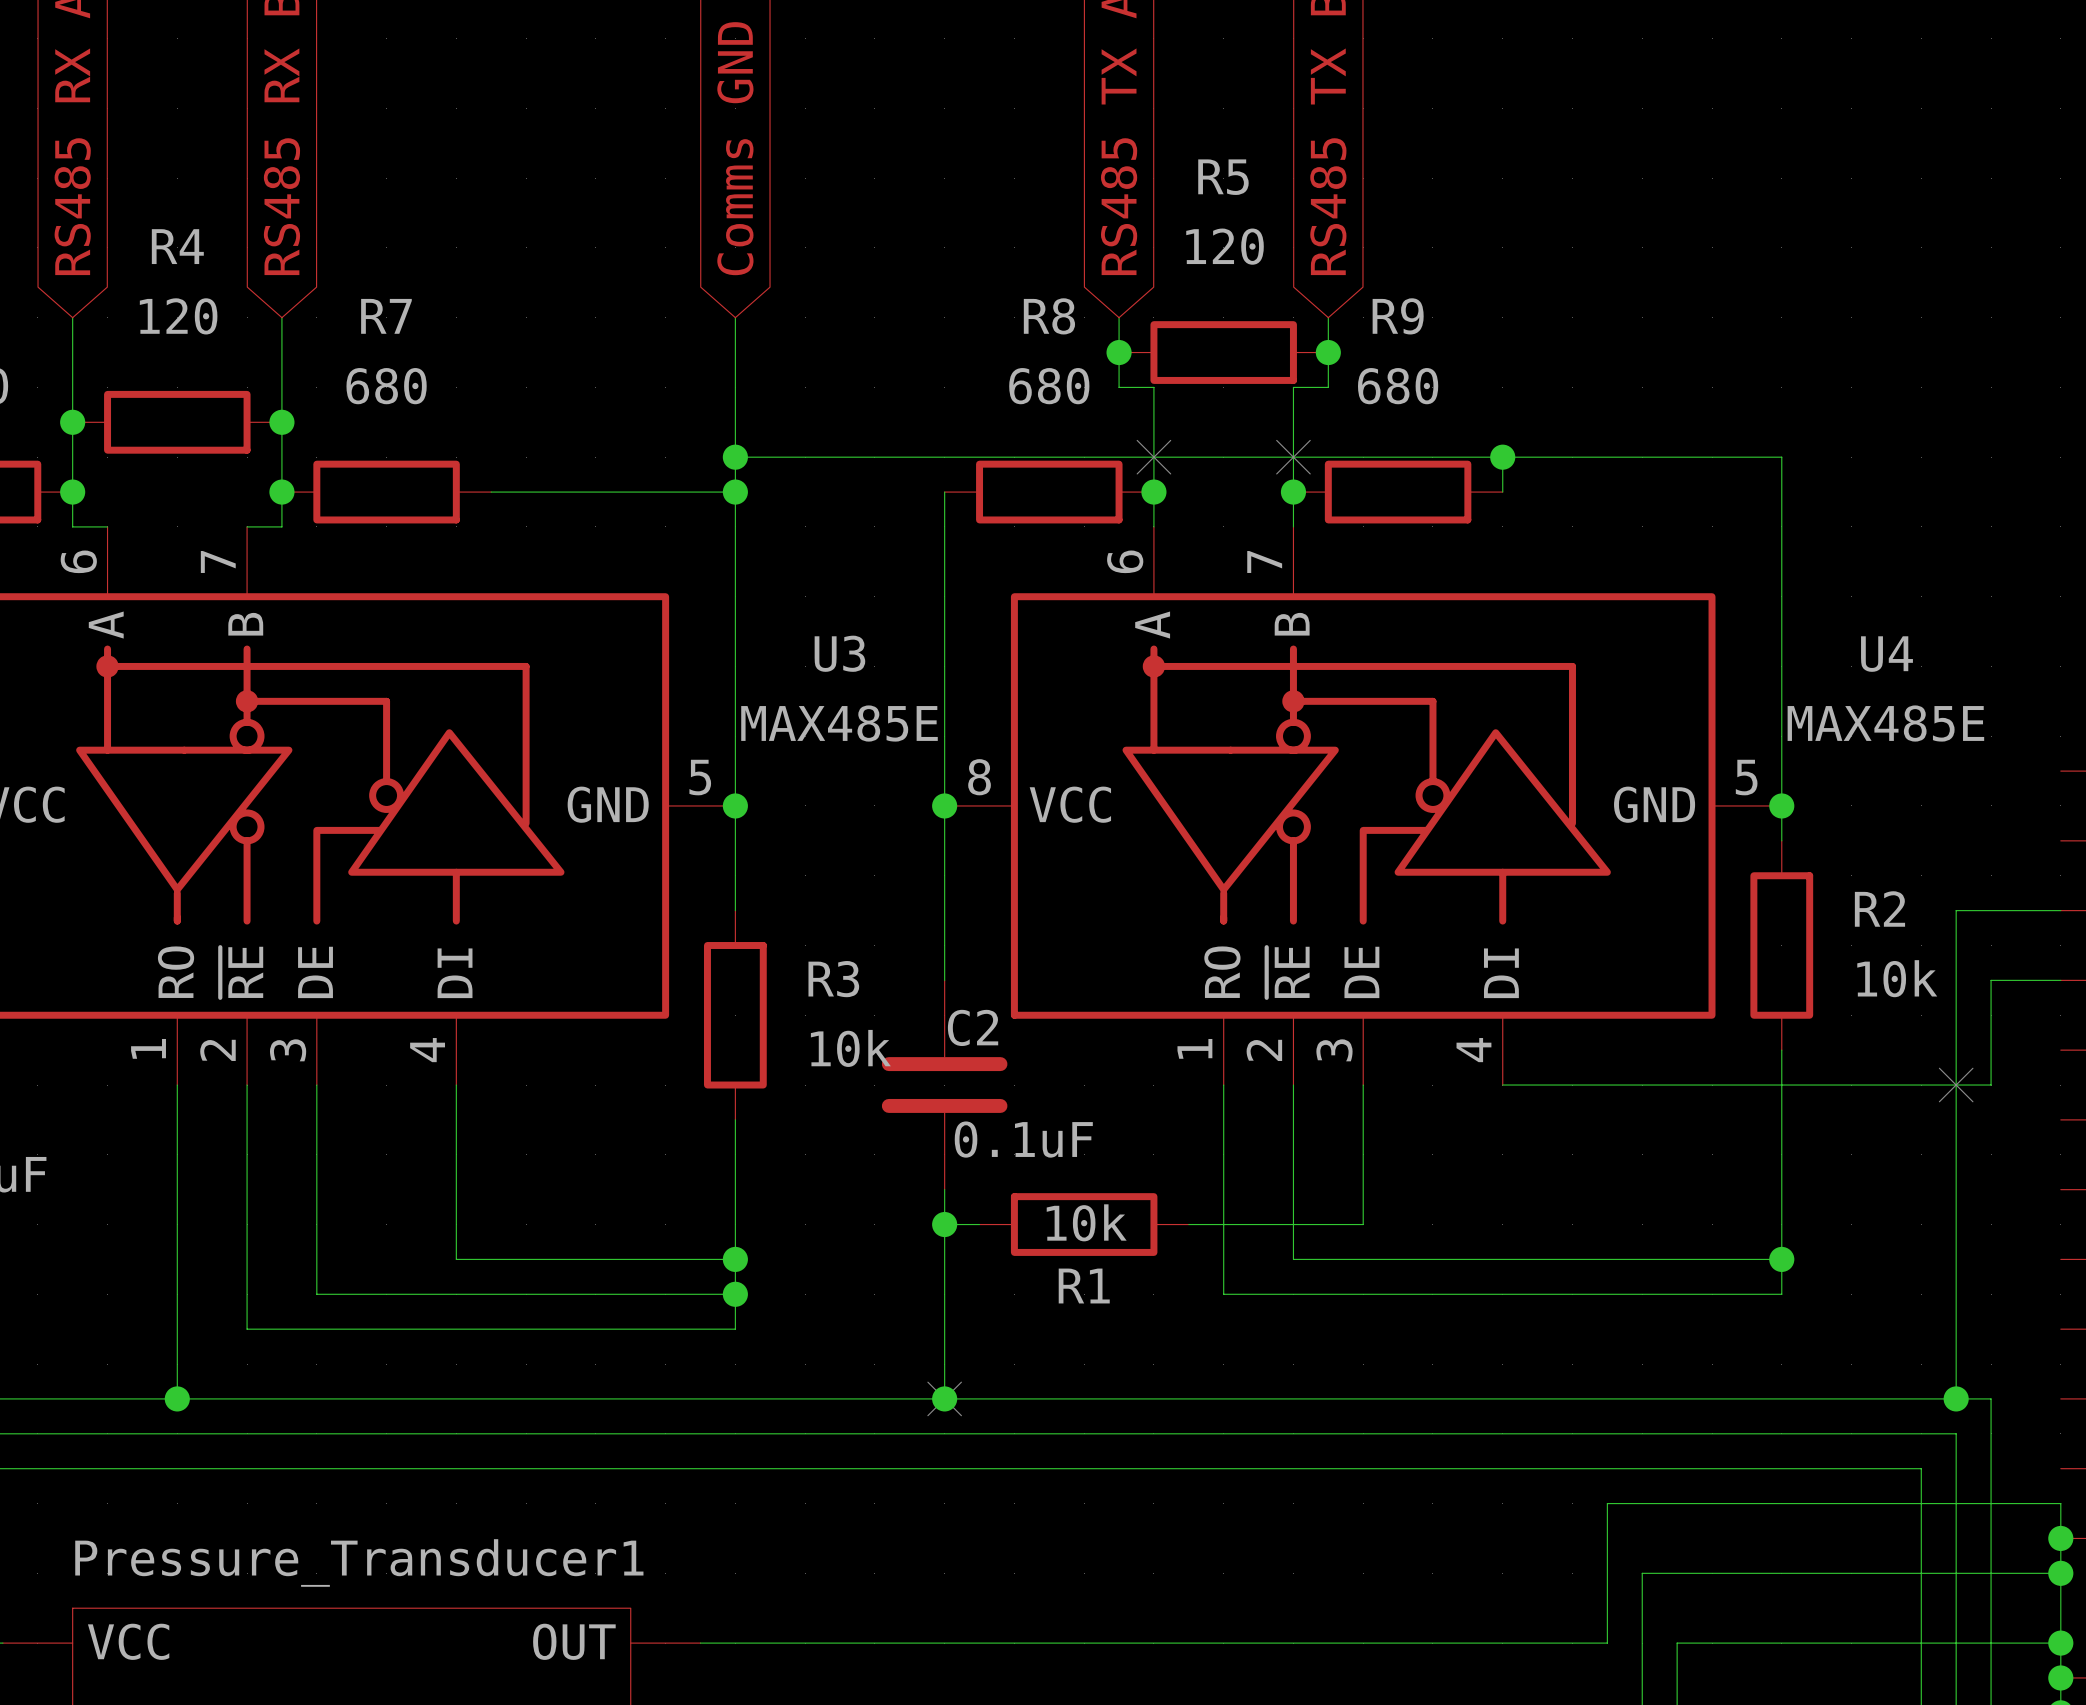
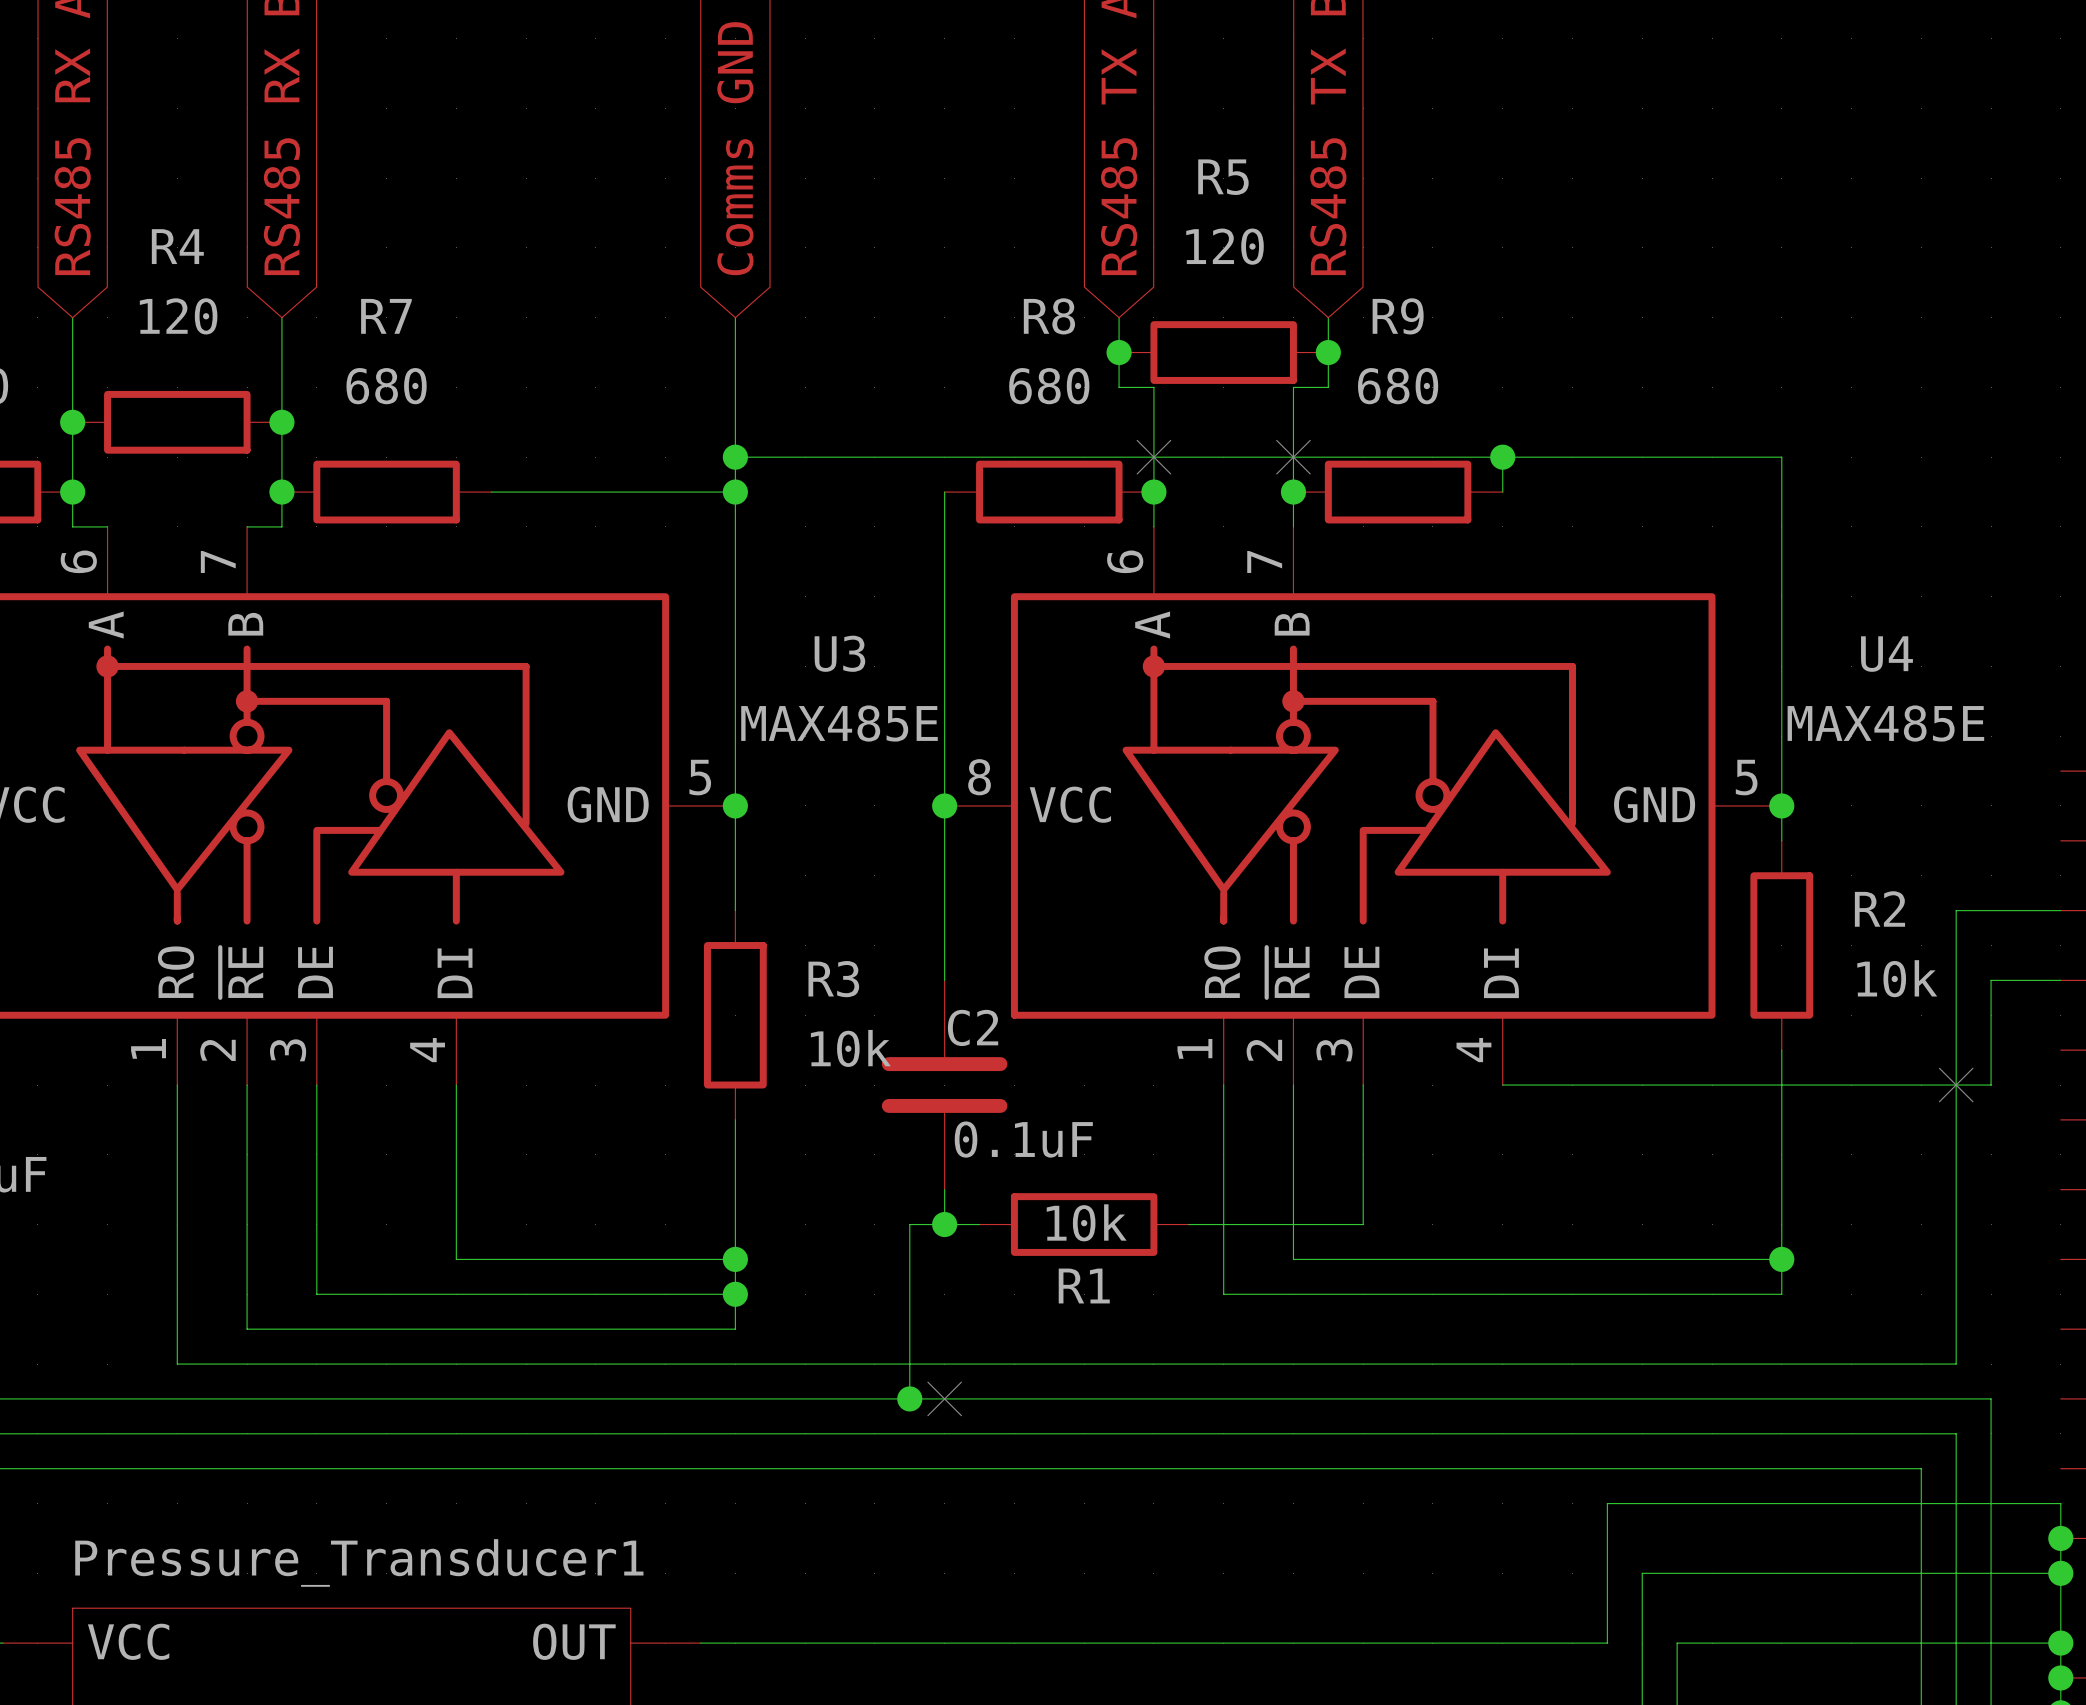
wire: (944, 1224) (944, 1398) -> (944, 1224) (909, 1224) (909, 1398)
wire: (177, 1364) (177, 1398) -> (177, 1364) (1956, 1364)
wire: (1956, 1364) (1956, 1398) -> none
junction: (177, 1398) -> none
junction position: (944, 1398) -> (909, 1398)
junction: (1956, 1398) -> none

